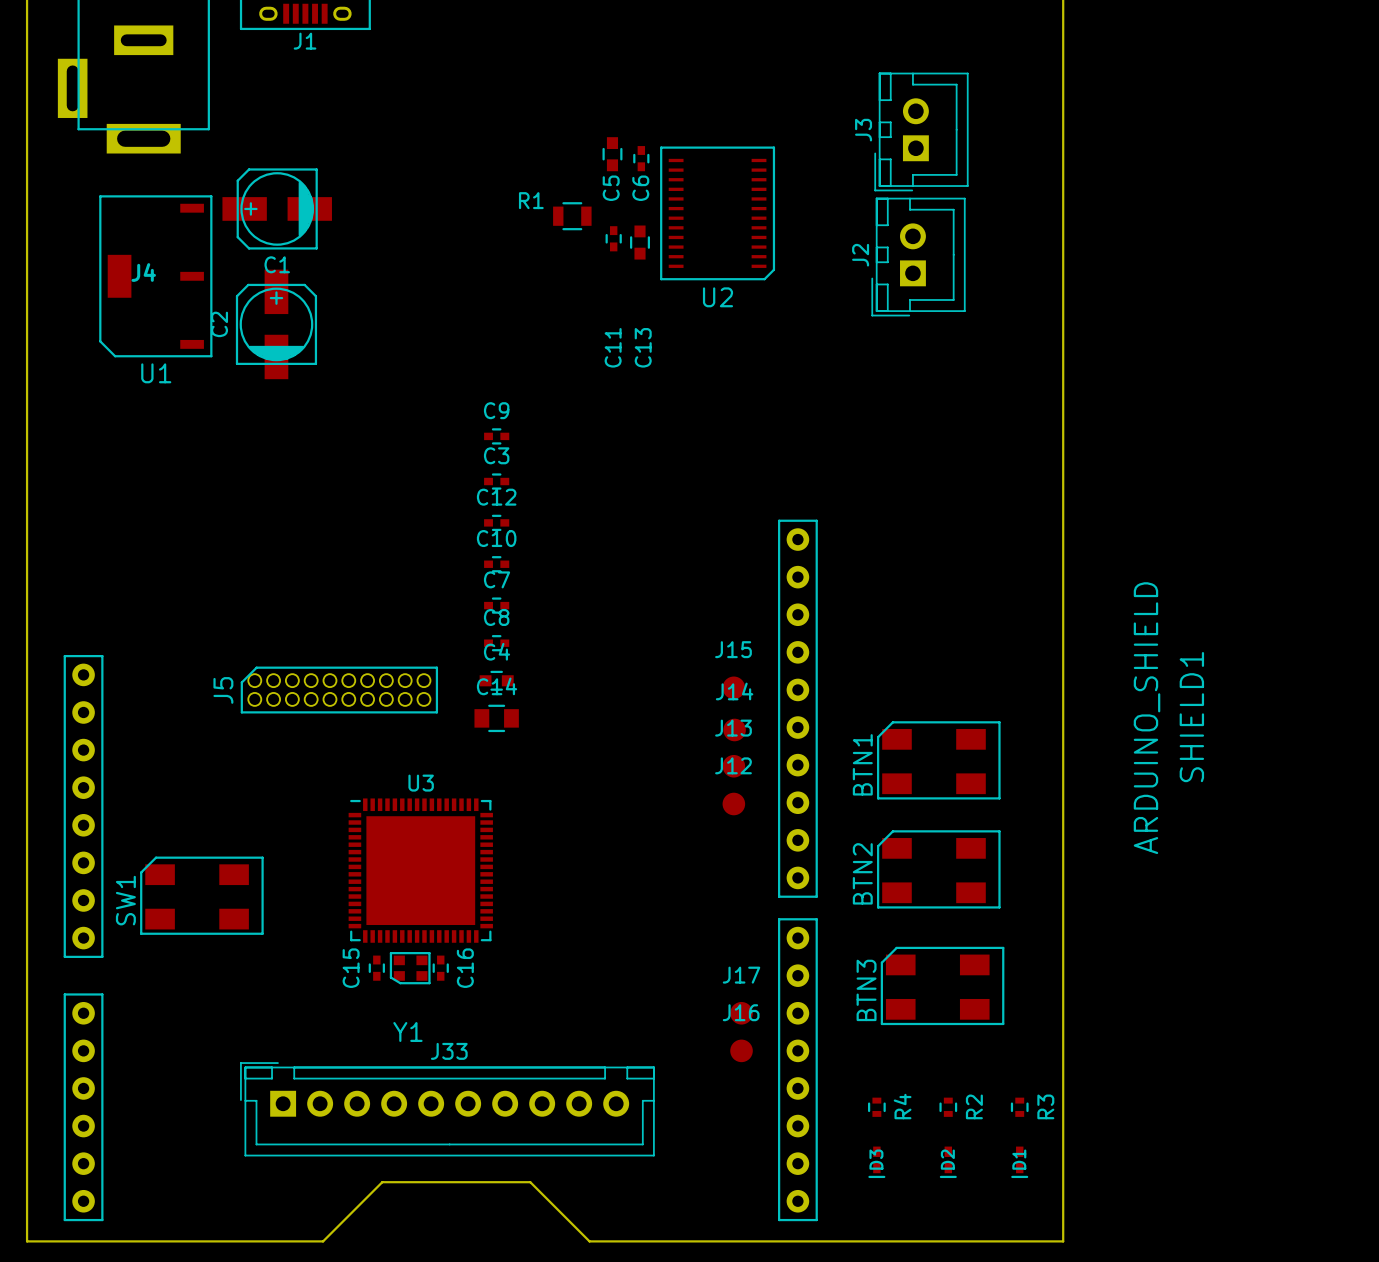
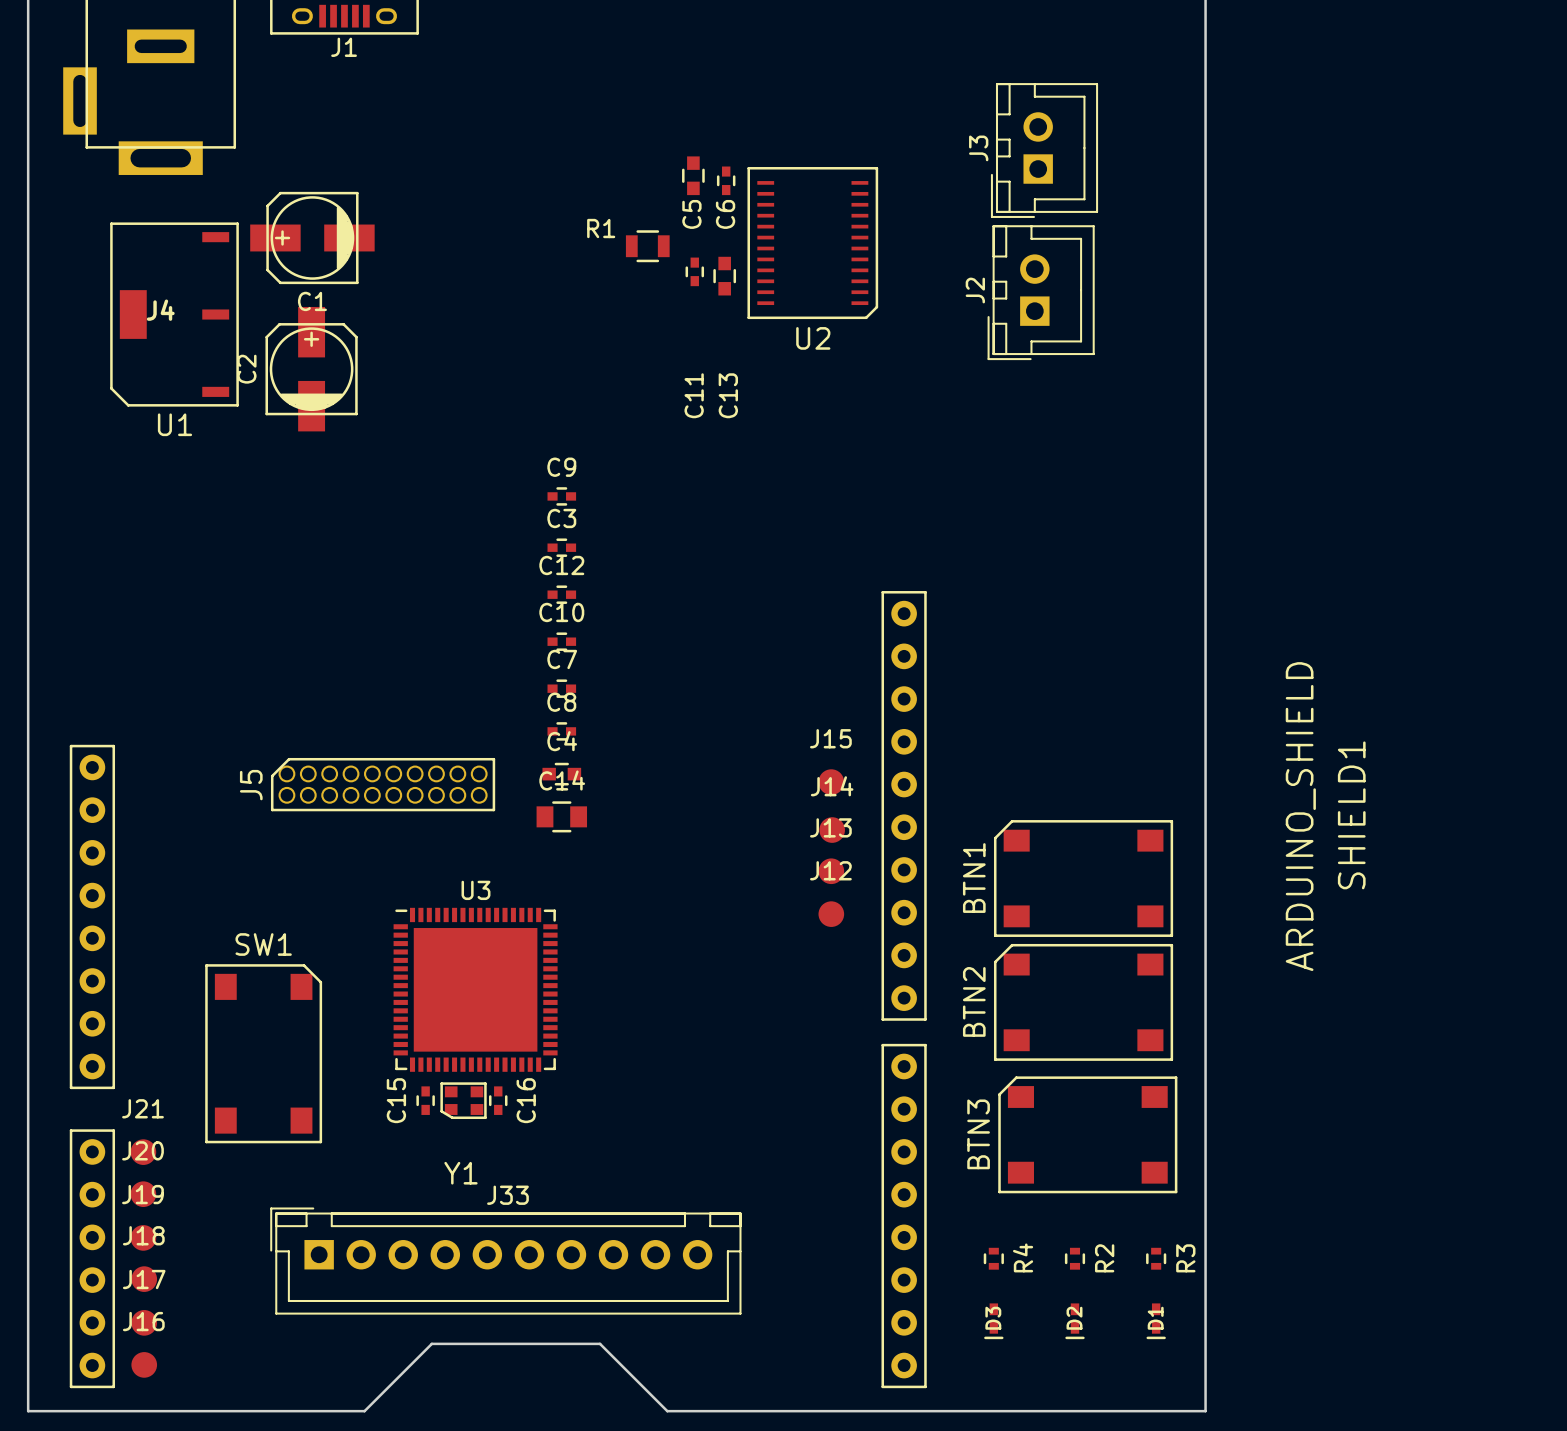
BTN1 footprint: [877, 721, 1001, 800] -> [993, 820, 1174, 937]
BTN2 footprint: [877, 830, 1001, 909] -> [993, 943, 1174, 1061]
SW1 footprint: [140, 856, 264, 935] -> [205, 964, 323, 1144]
SW1 name position: SW1 (125, 900) -> SW1 (263, 944)
BTN3 footprint: [880, 946, 1005, 1026] -> [998, 1076, 1178, 1194]
J21: none -> (143, 1152)
J17 position: (741, 1013) -> (144, 1322)
J20: none -> (143, 1194)
J16 position: (741, 1050) -> (144, 1364)
J19: none -> (143, 1237)
J18: none -> (144, 1279)

